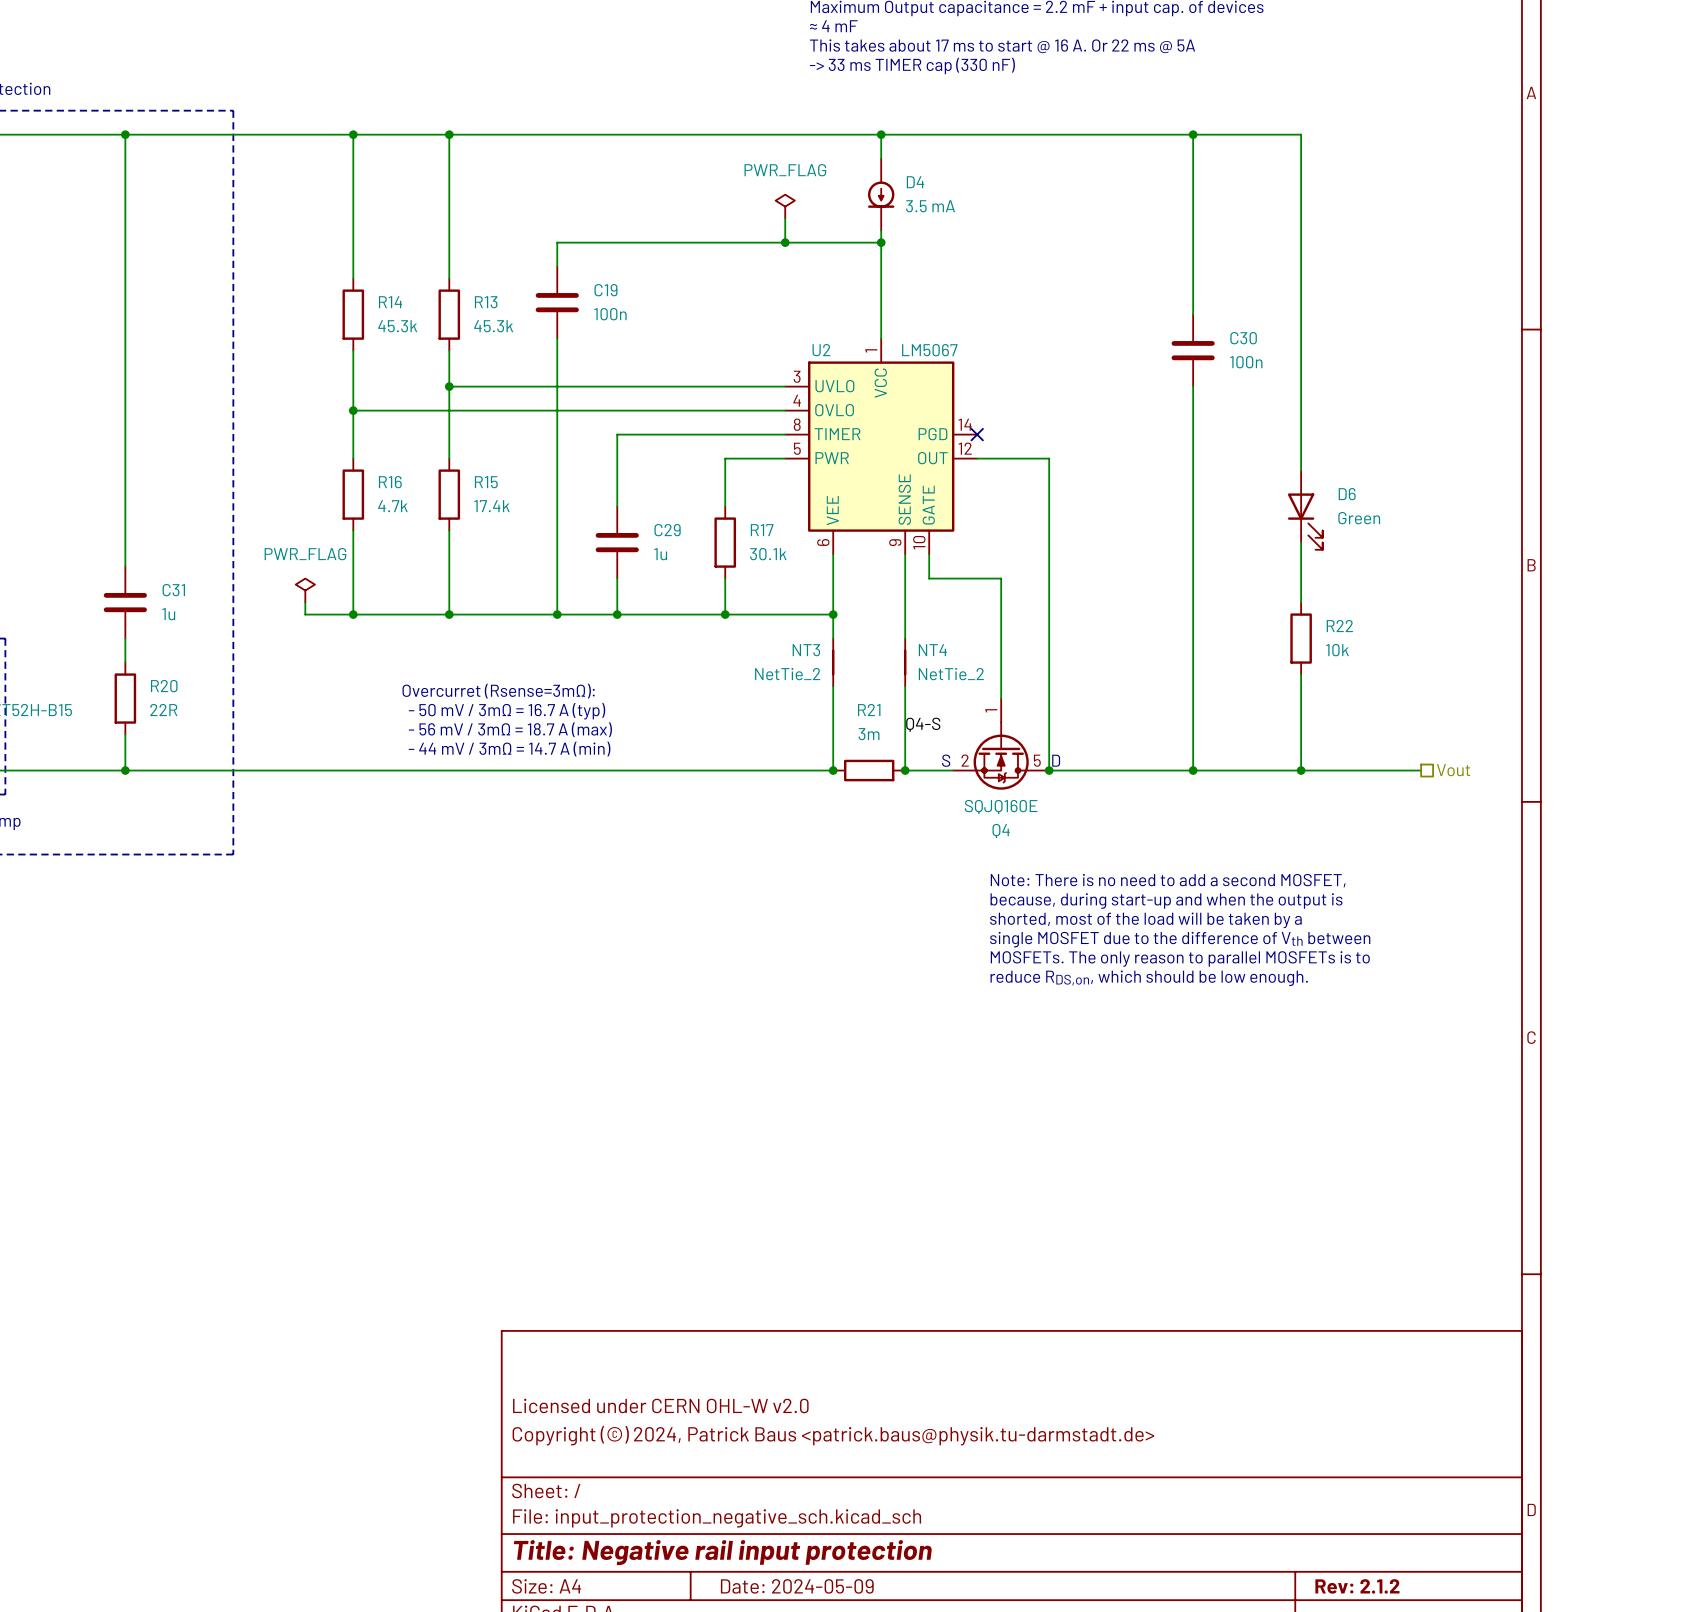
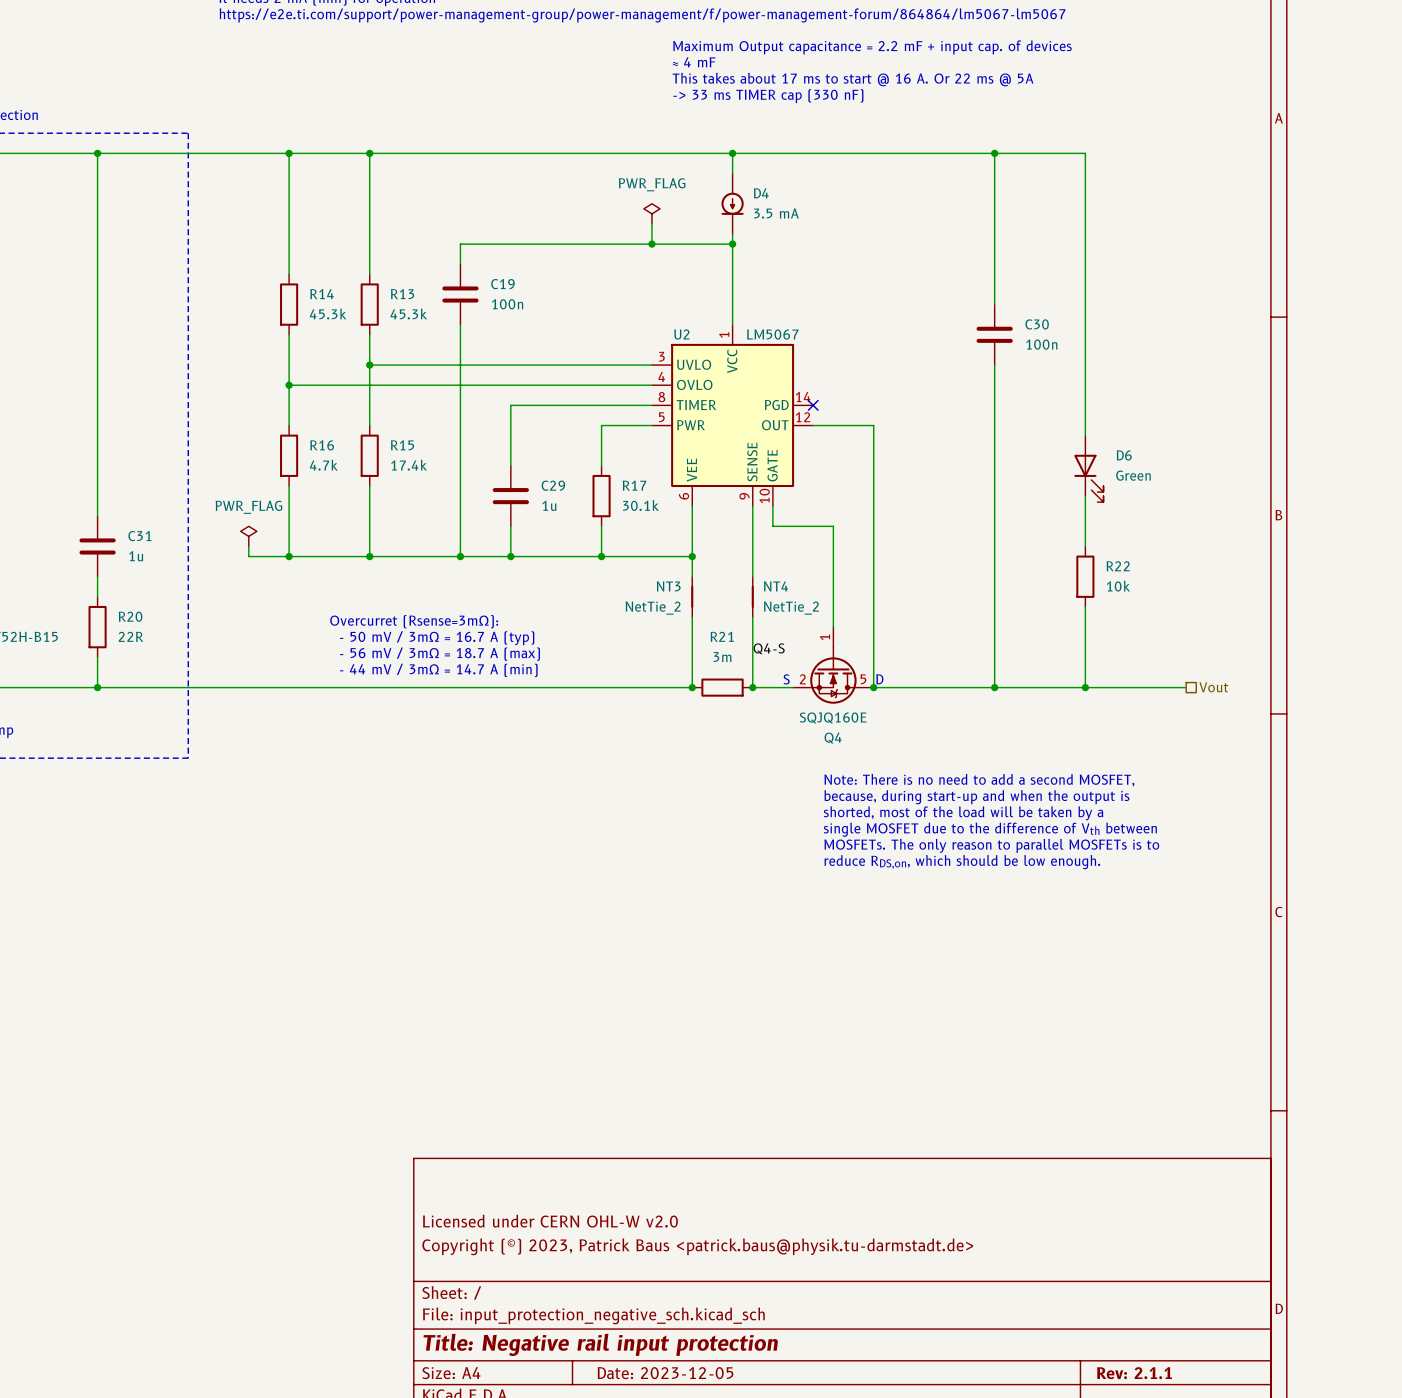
title block: Copyright (©) 2024, Patrick Baus <patrick.baus@physik.tu-darmstadt.de> (833, 1435) -> Copyright (©) 2023, Patrick Baus <patrick.baus@physik.tu-darmstadt.de> (697, 1246)
title block: Date: 2024-05-09 (797, 1586) -> Date: 2023-12-05 (665, 1373)
title block: Rev: 2.1.2 (1357, 1586) -> Rev: 2.1.1 (1134, 1373)

